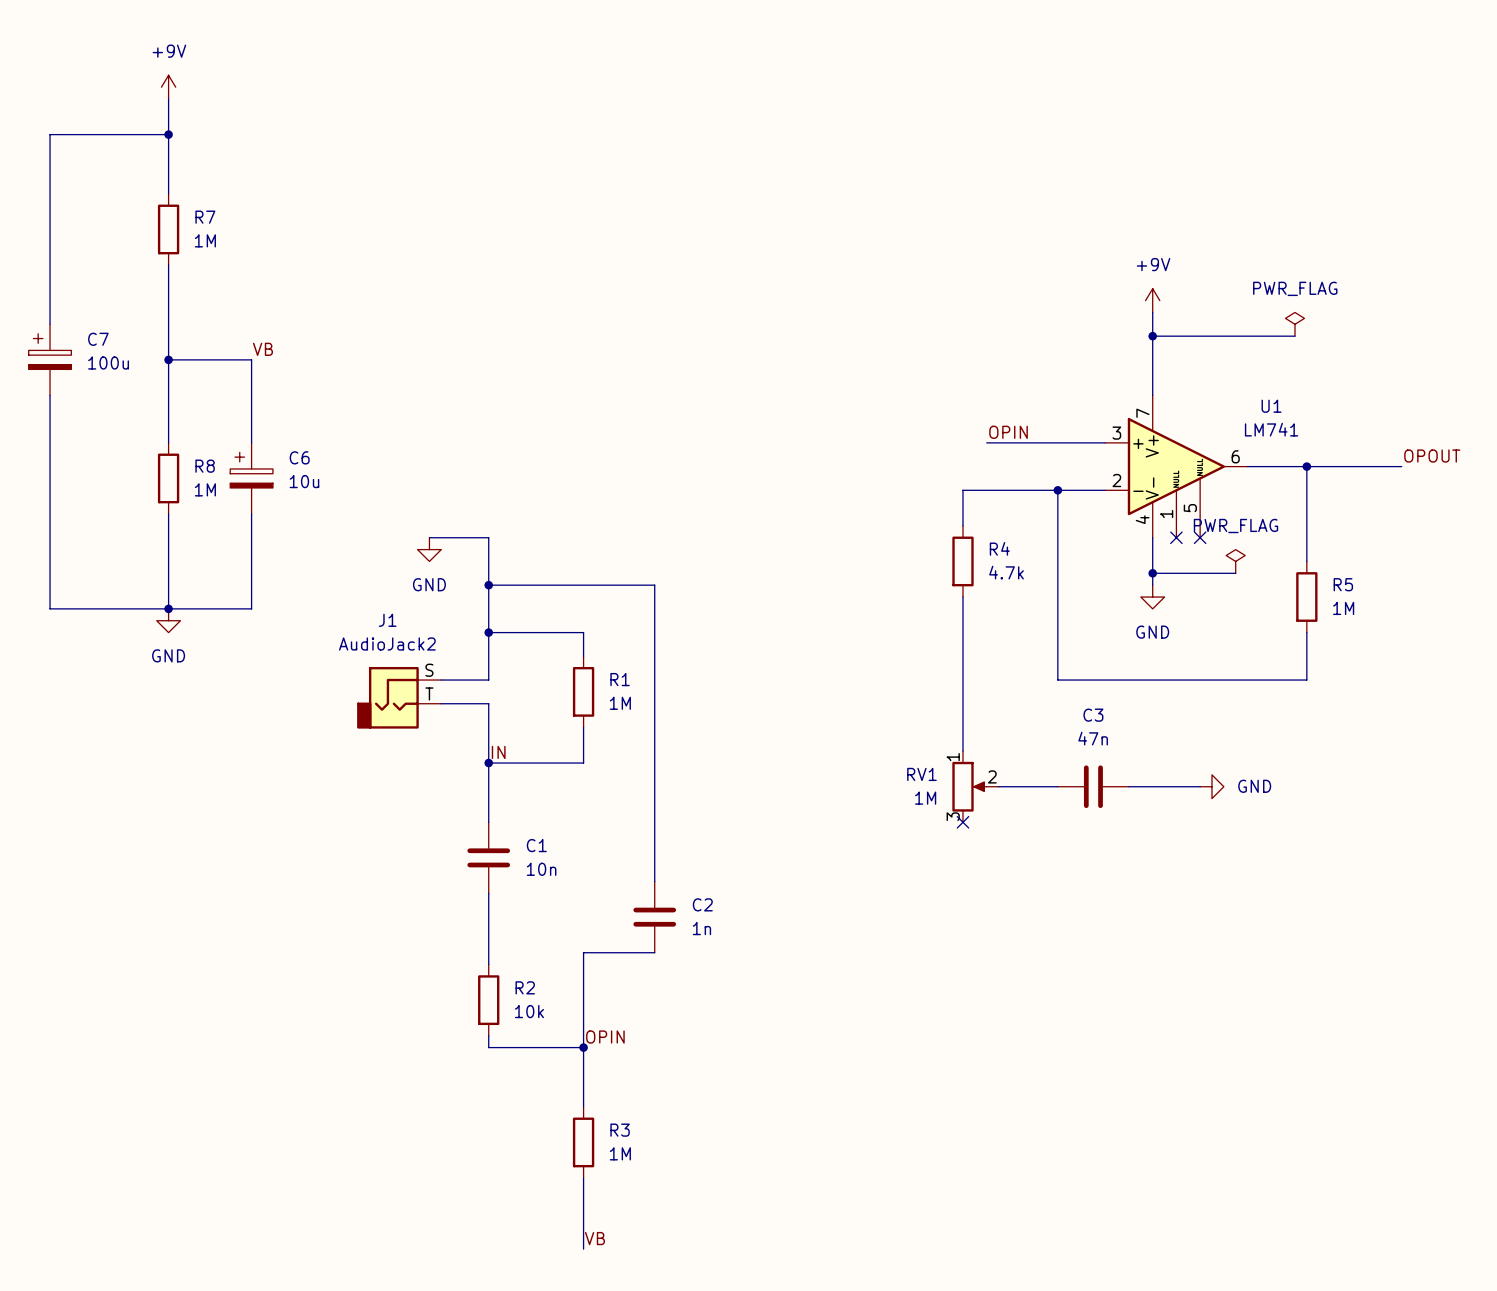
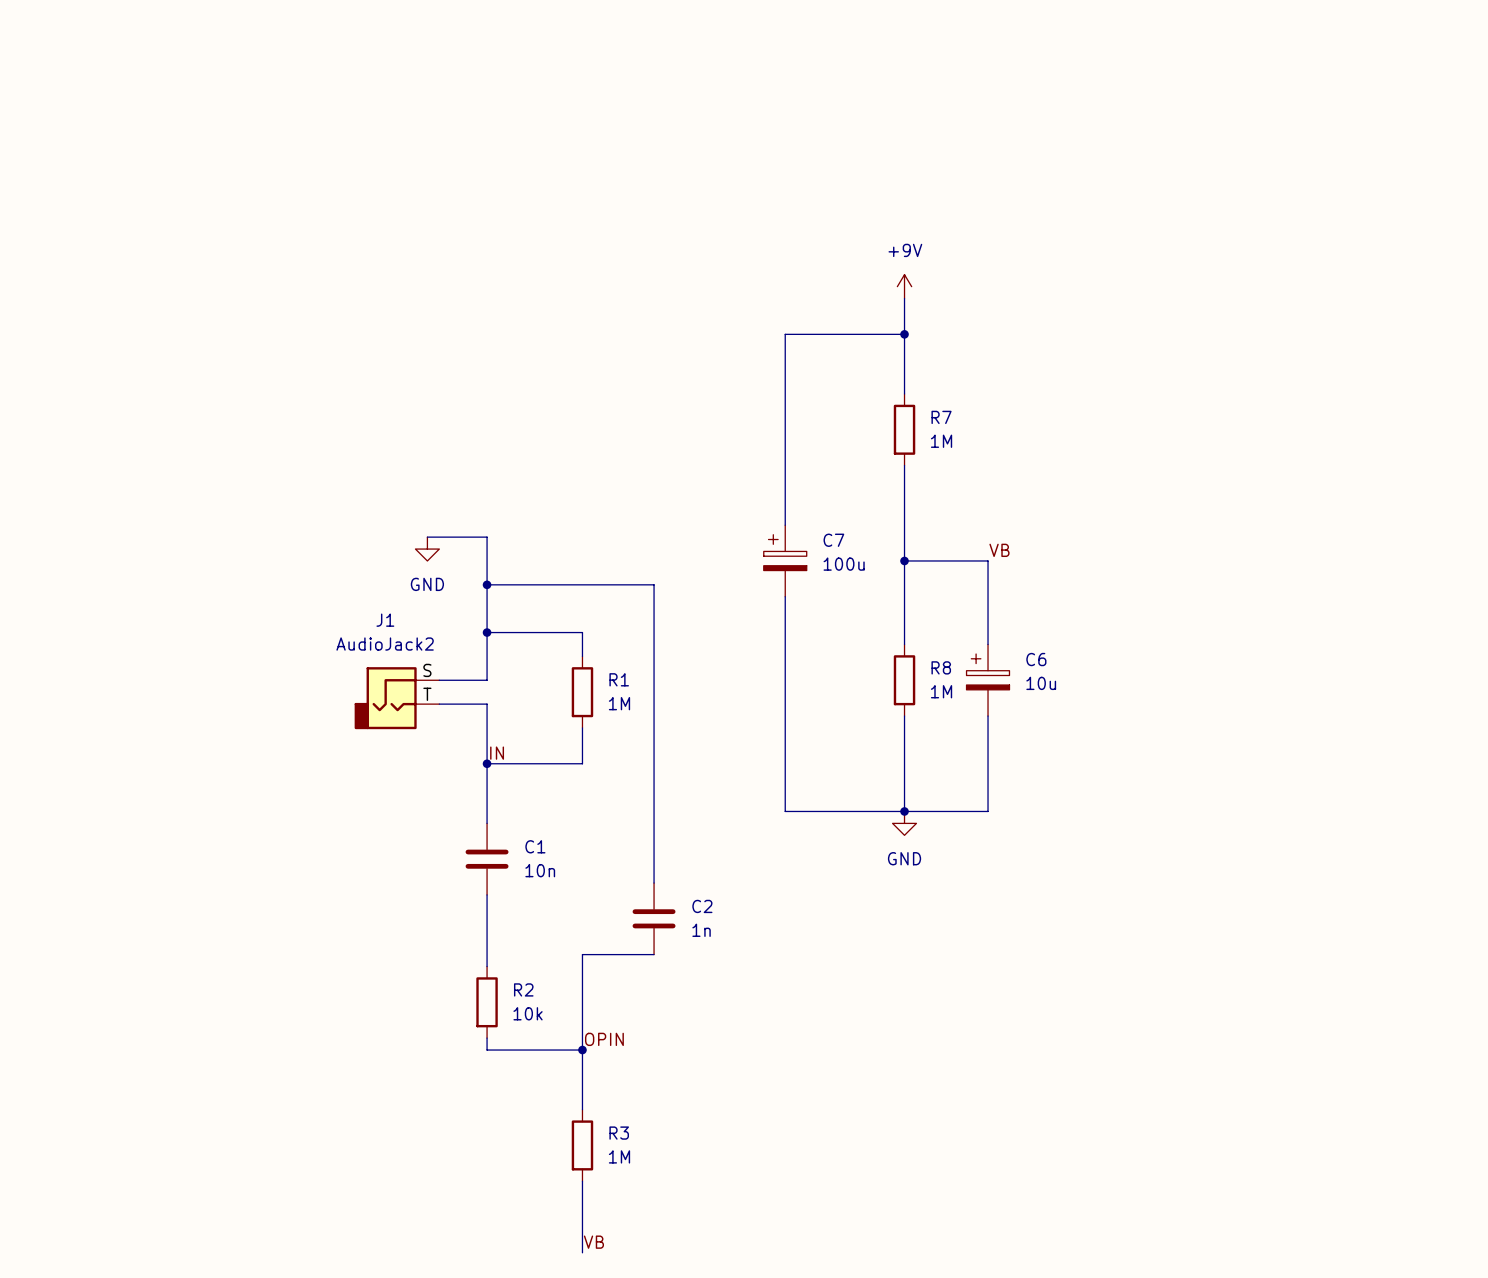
power symbol: +9V (168, 87) -> none
wire: (168, 99) (168, 193) -> none
wire: (168, 134) (50, 134) (50, 324) -> none
junction: (168, 134) -> none
R7 position: (168, 229) -> (904, 429)
wire: (168, 265) (168, 442) -> none
power symbol: none -> +9V (904, 286)
wire: none -> (904, 298) (904, 393)
power symbol: +9V (1152, 300) -> none
wire: (1152, 312) (1152, 395) -> none
power symbol: PWR_FLAG (1294, 324) -> none
wire: none -> (904, 334) (785, 334) (785, 525)
junction: none -> (904, 334)
wire: (1152, 336) (1294, 336) -> none
junction: (1152, 336) -> none
label: VB (262, 349) -> none
C7 position: (50, 359) -> (785, 560)
wire: (168, 359) (251, 359) (251, 442) -> none
junction: (168, 359) -> none
wire: (50, 395) (50, 608) (251, 608) (251, 514) -> none
label: OPIN (1008, 432) -> none
wire: (986, 442) (1105, 442) -> none
label: OPOUT (1432, 456) -> none
wire: none -> (904, 465) (904, 644)
U1: LM741 (1176, 466) -> none
wire: (1247, 466) (1401, 466) -> none
wire: (1306, 466) (1306, 561) -> none
junction: (1306, 466) -> none
R8 position: (168, 478) -> (904, 680)
C6 position: (251, 478) -> (988, 680)
wire: (1057, 490) (1057, 680) (1306, 680) (1306, 632) -> none
junction: (1057, 490) -> none
wire: (1105, 490) (962, 490) (962, 525) -> none
wire: (168, 514) (168, 608) -> none
wire: (1152, 537) (1152, 585) -> none
no-connect mark: (1176, 537) -> none
no-connect mark: (1200, 537) -> none
label: none -> VB (999, 550)
wire: none -> (904, 560) (988, 560) (988, 644)
junction: none -> (904, 560)
R4: 4.7k (962, 561) -> none
power symbol: PWR_FLAG (1235, 561) -> none
wire: (1152, 573) (1235, 573) -> none
junction: (1152, 573) -> none
wire: none -> (785, 596) (785, 811) (988, 811) (988, 716)
wire: (962, 597) (962, 751) -> none
power symbol: GND (1152, 597) -> none
R5: 1M (1306, 597) -> none
junction: (168, 608) -> none
power symbol: GND (168, 620) -> none
wire: none -> (904, 716) (904, 811)
RV1: 1M (975, 786) -> none
wire: (998, 786) (1057, 786) -> none
C3: 47n (1093, 786) -> none
wire: (1128, 786) (1200, 786) -> none
power symbol: GND (1211, 786) -> none
junction: none -> (904, 811)
power symbol: none -> GND (904, 823)
no-connect mark: (962, 822) -> none

